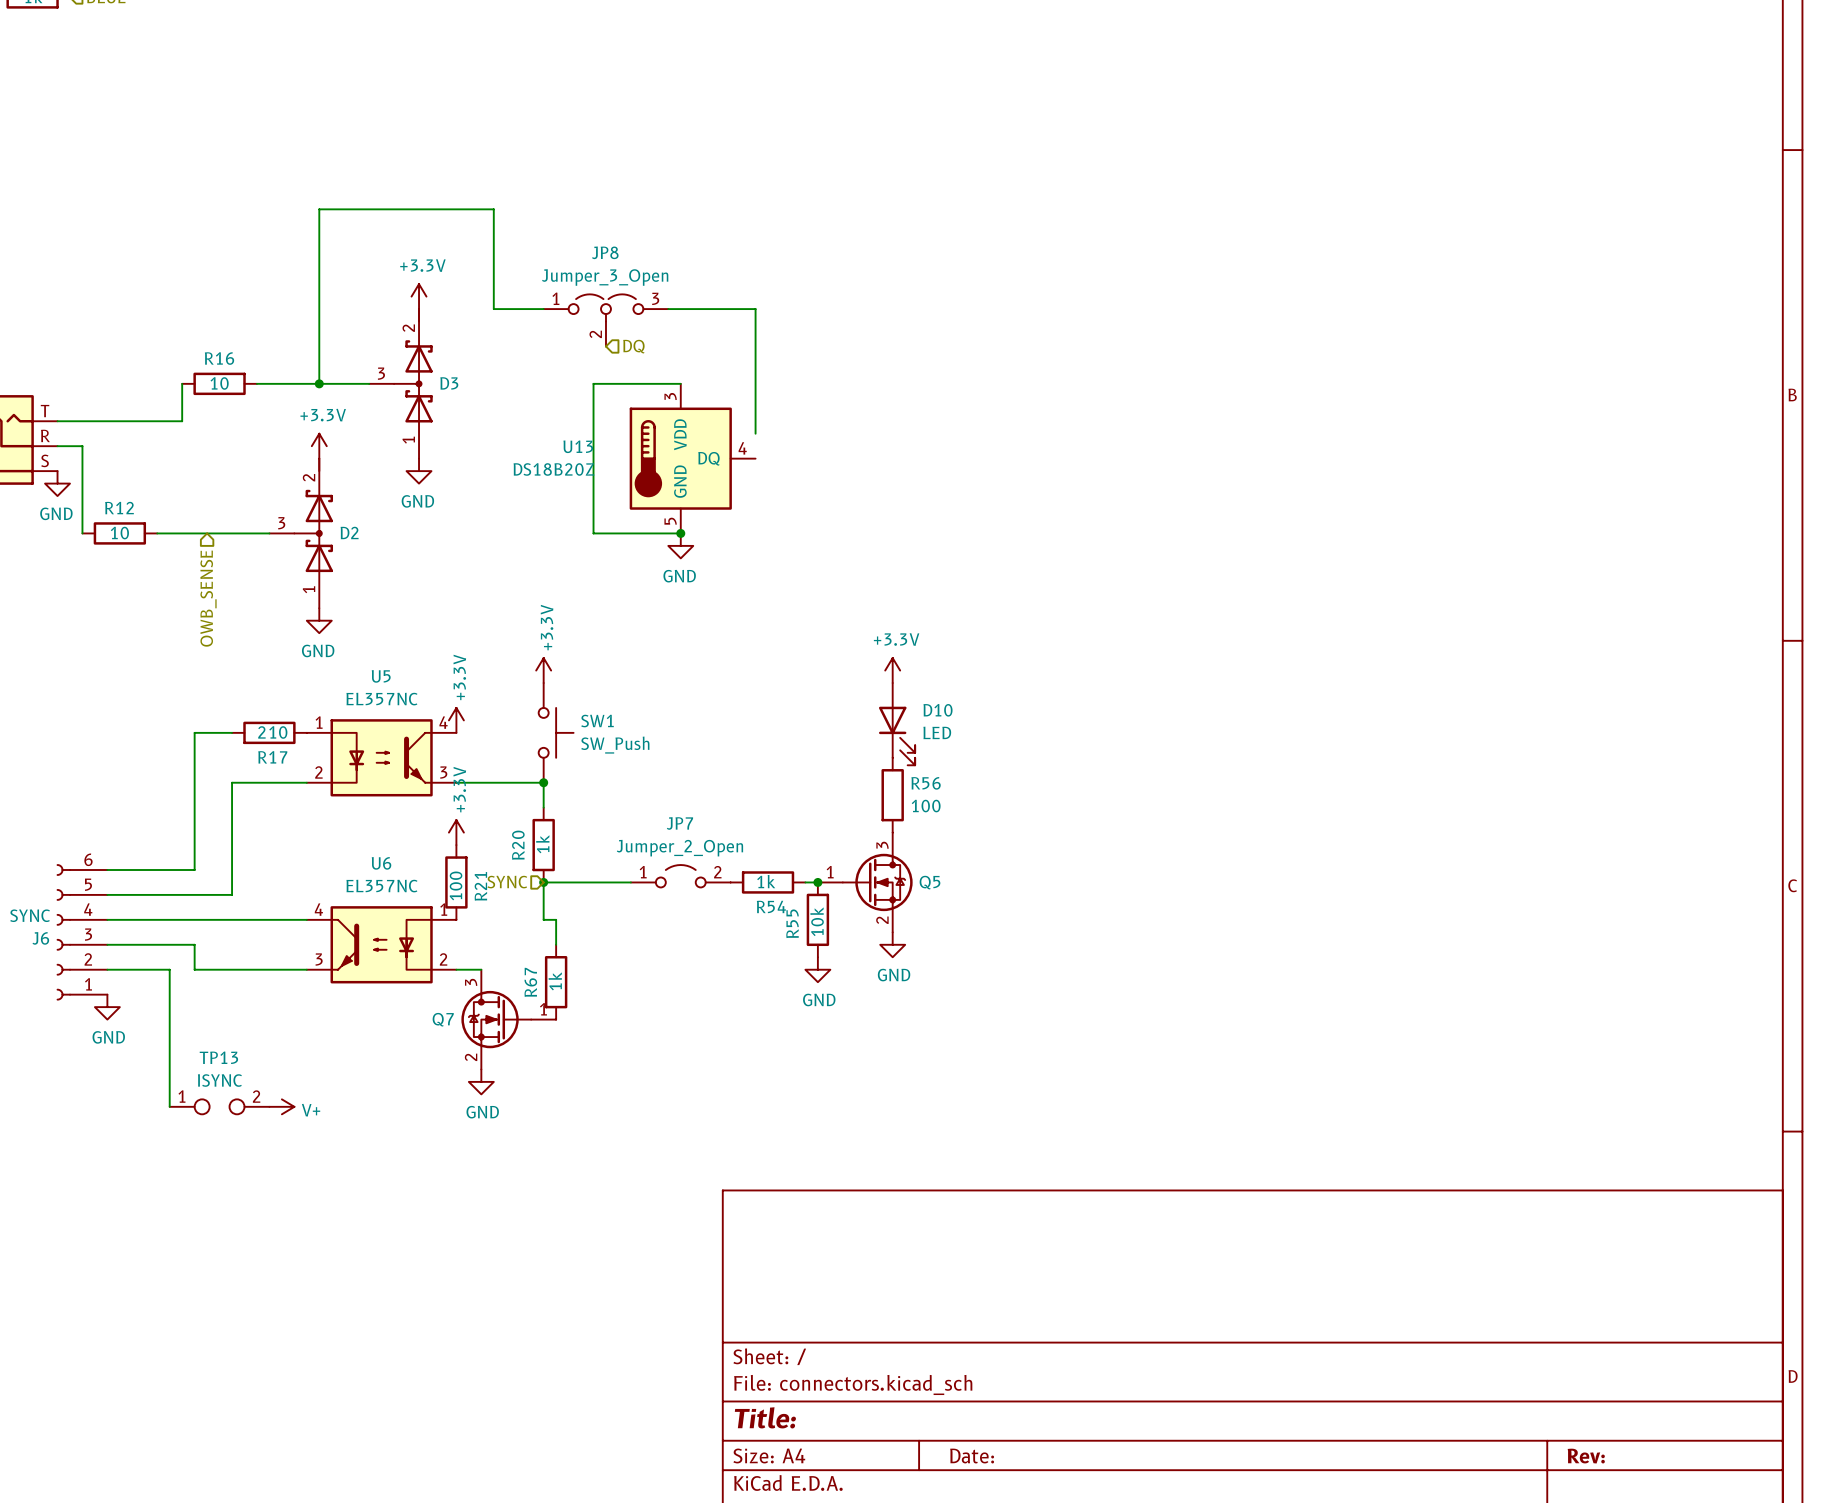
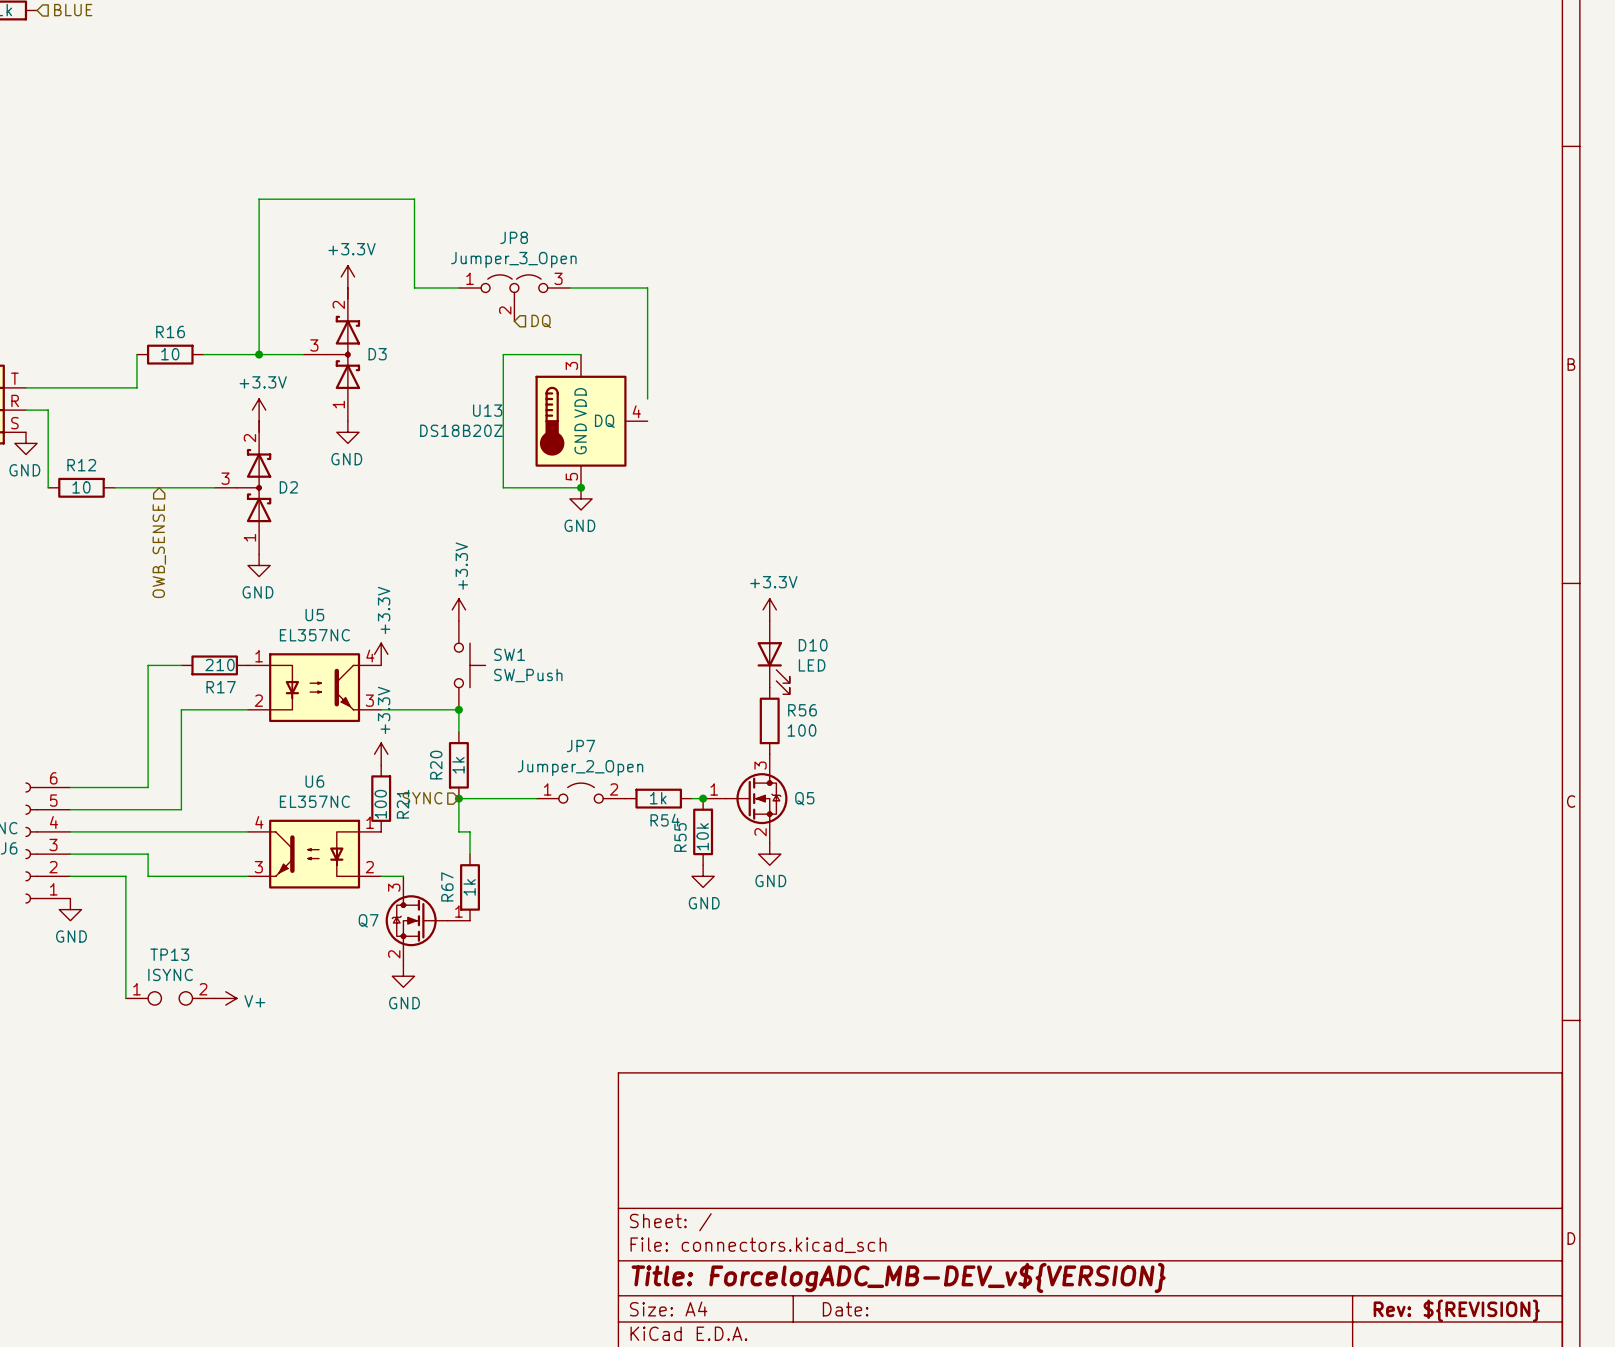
title block: Title: (765, 1417) -> Title: ForcelogADC_MB-DEV_v${VERSION} (898, 1277)
title block: Rev: (1586, 1456) -> Rev: ${REVISION} (1456, 1310)

